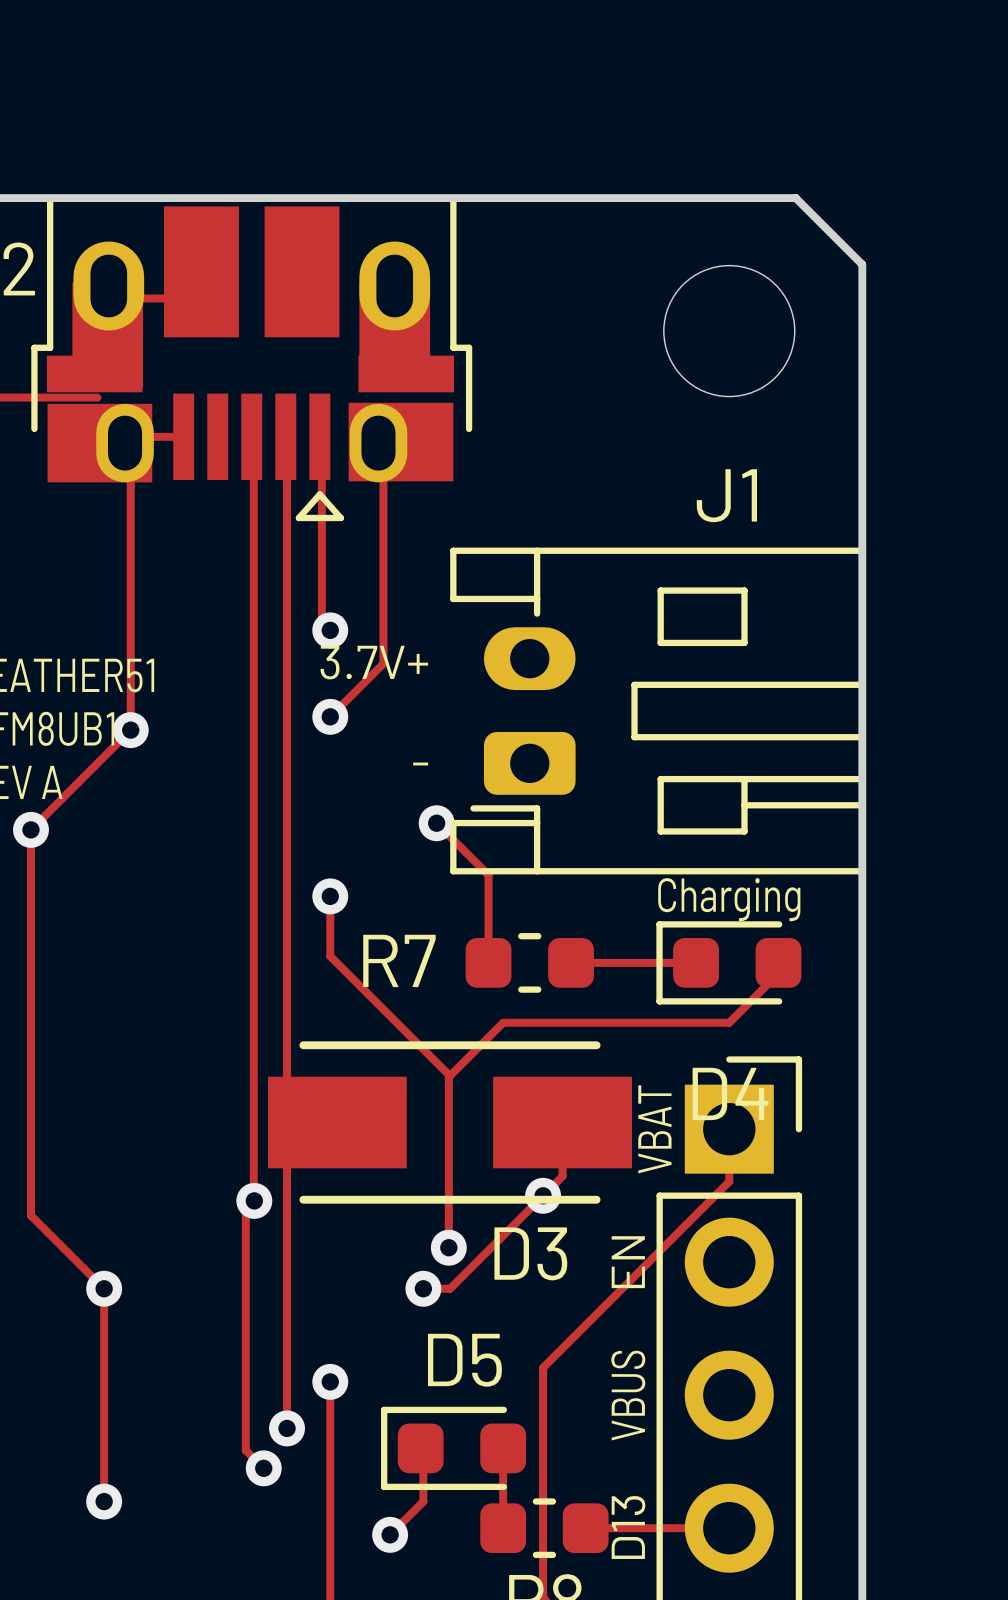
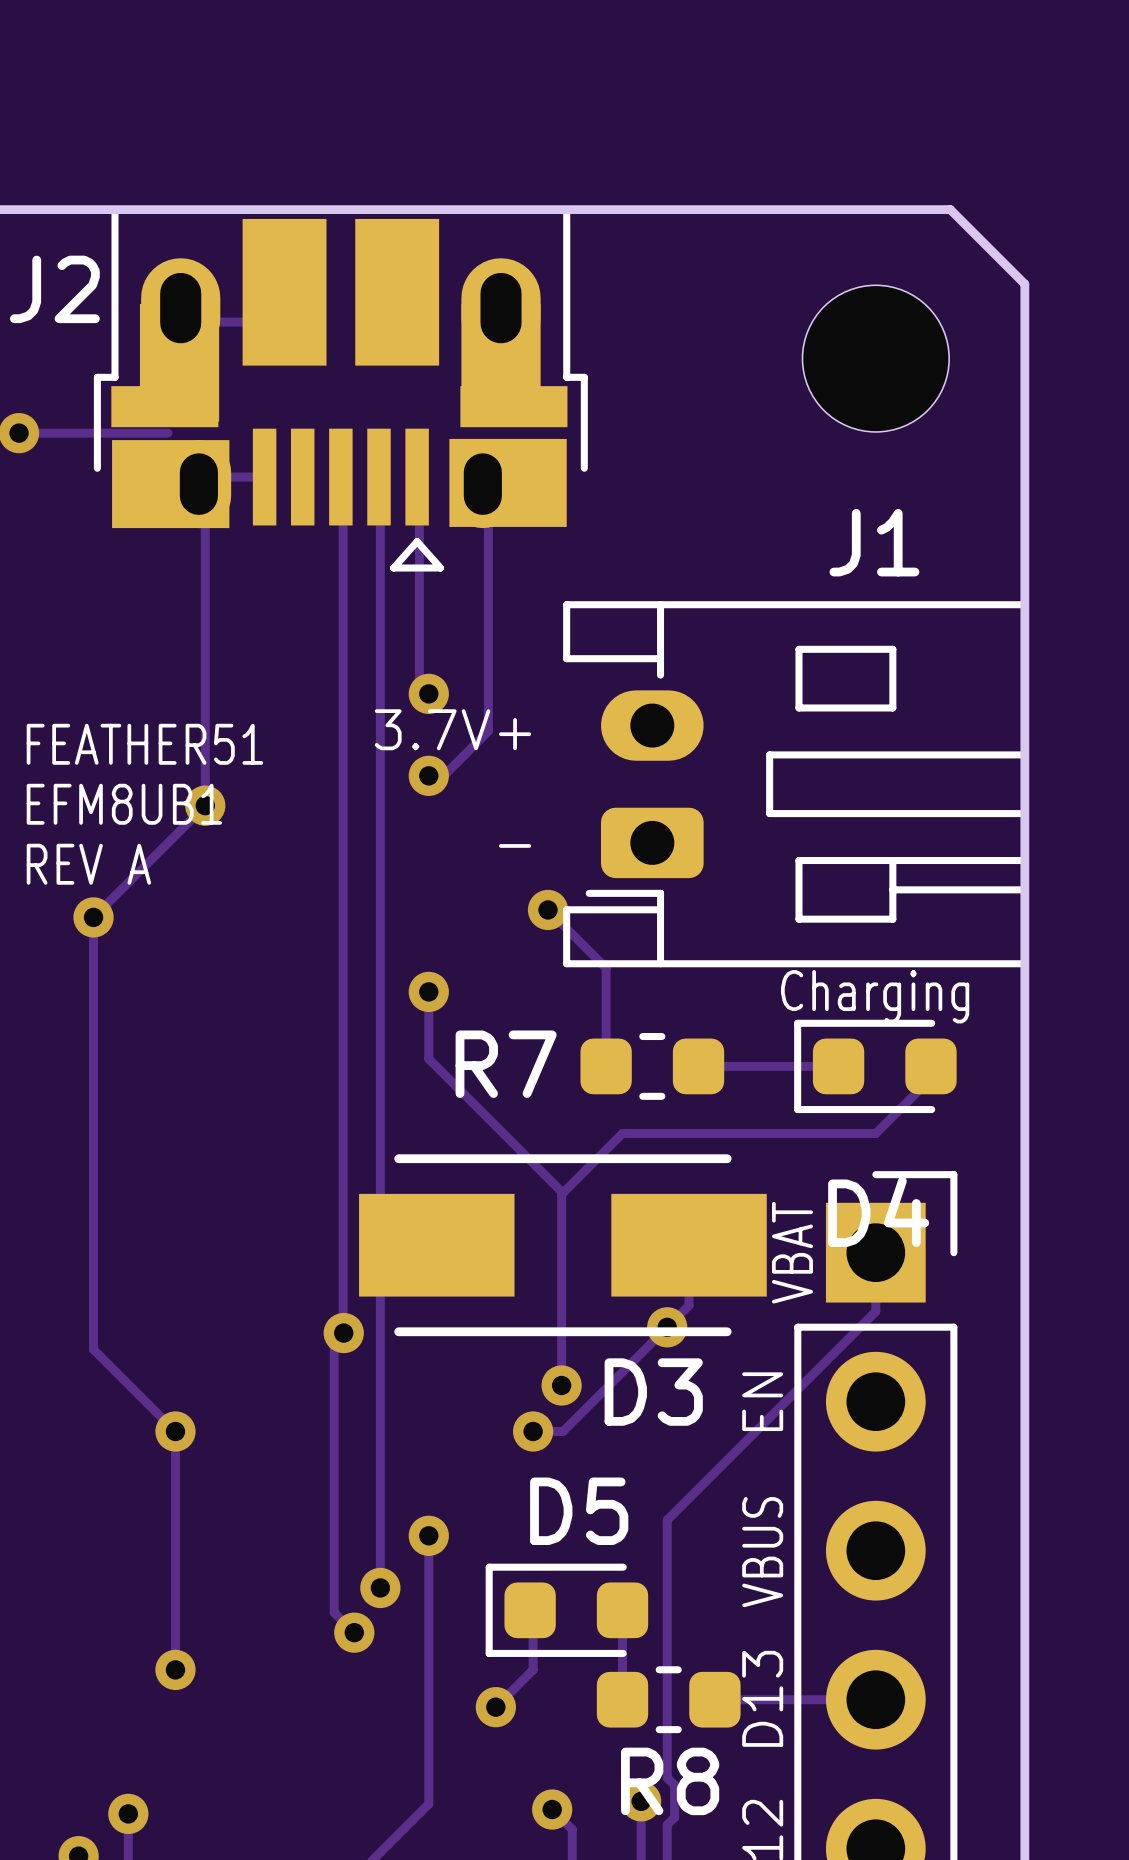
via position: (330, 716) -> (428, 775)

